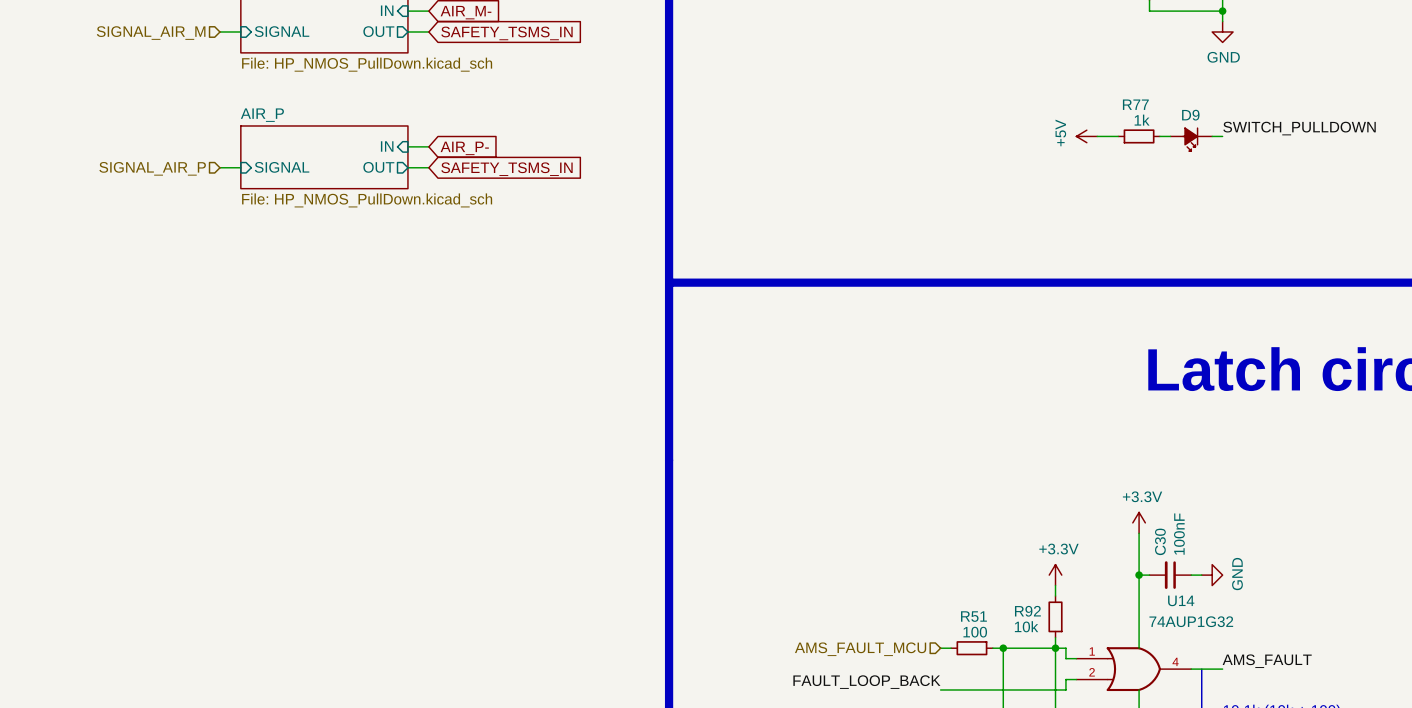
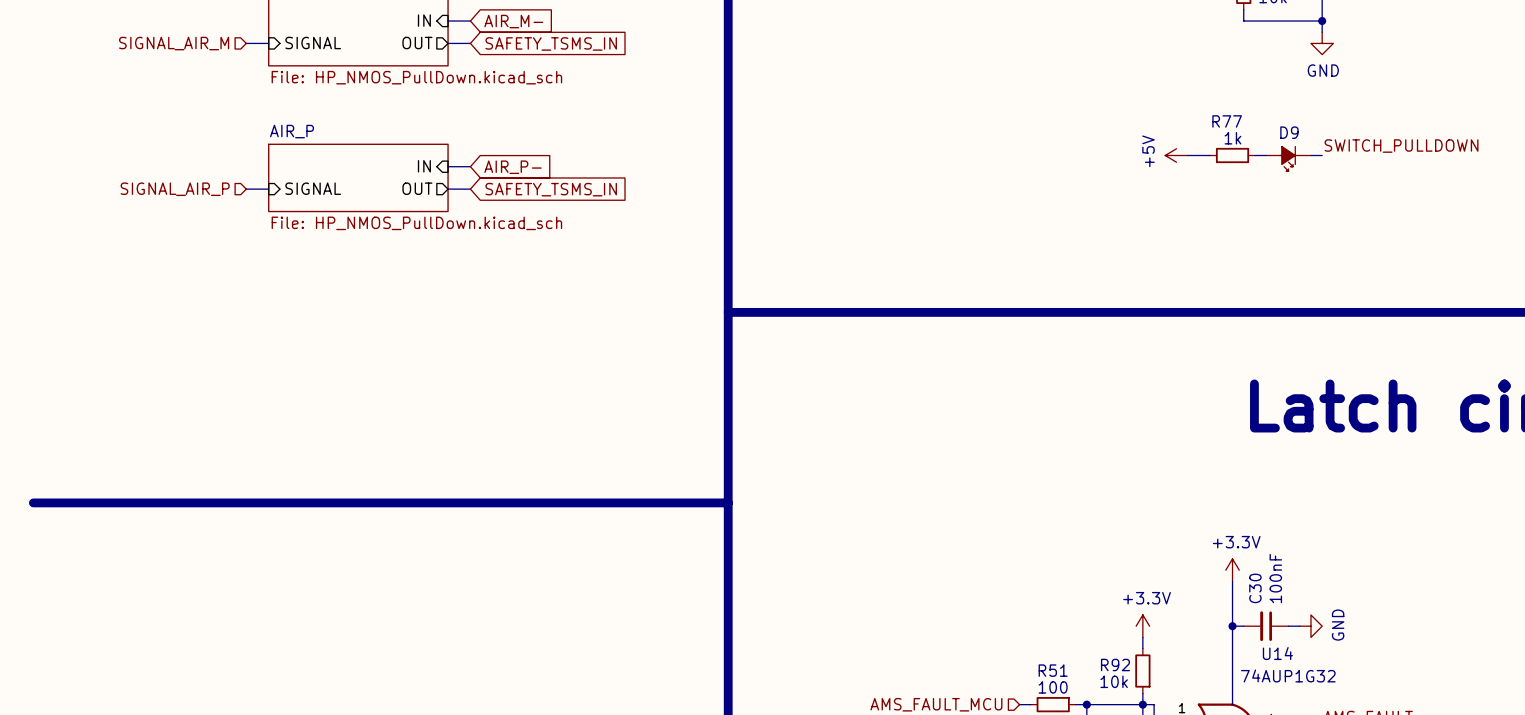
line: none -> (33, 502) (728, 502)

